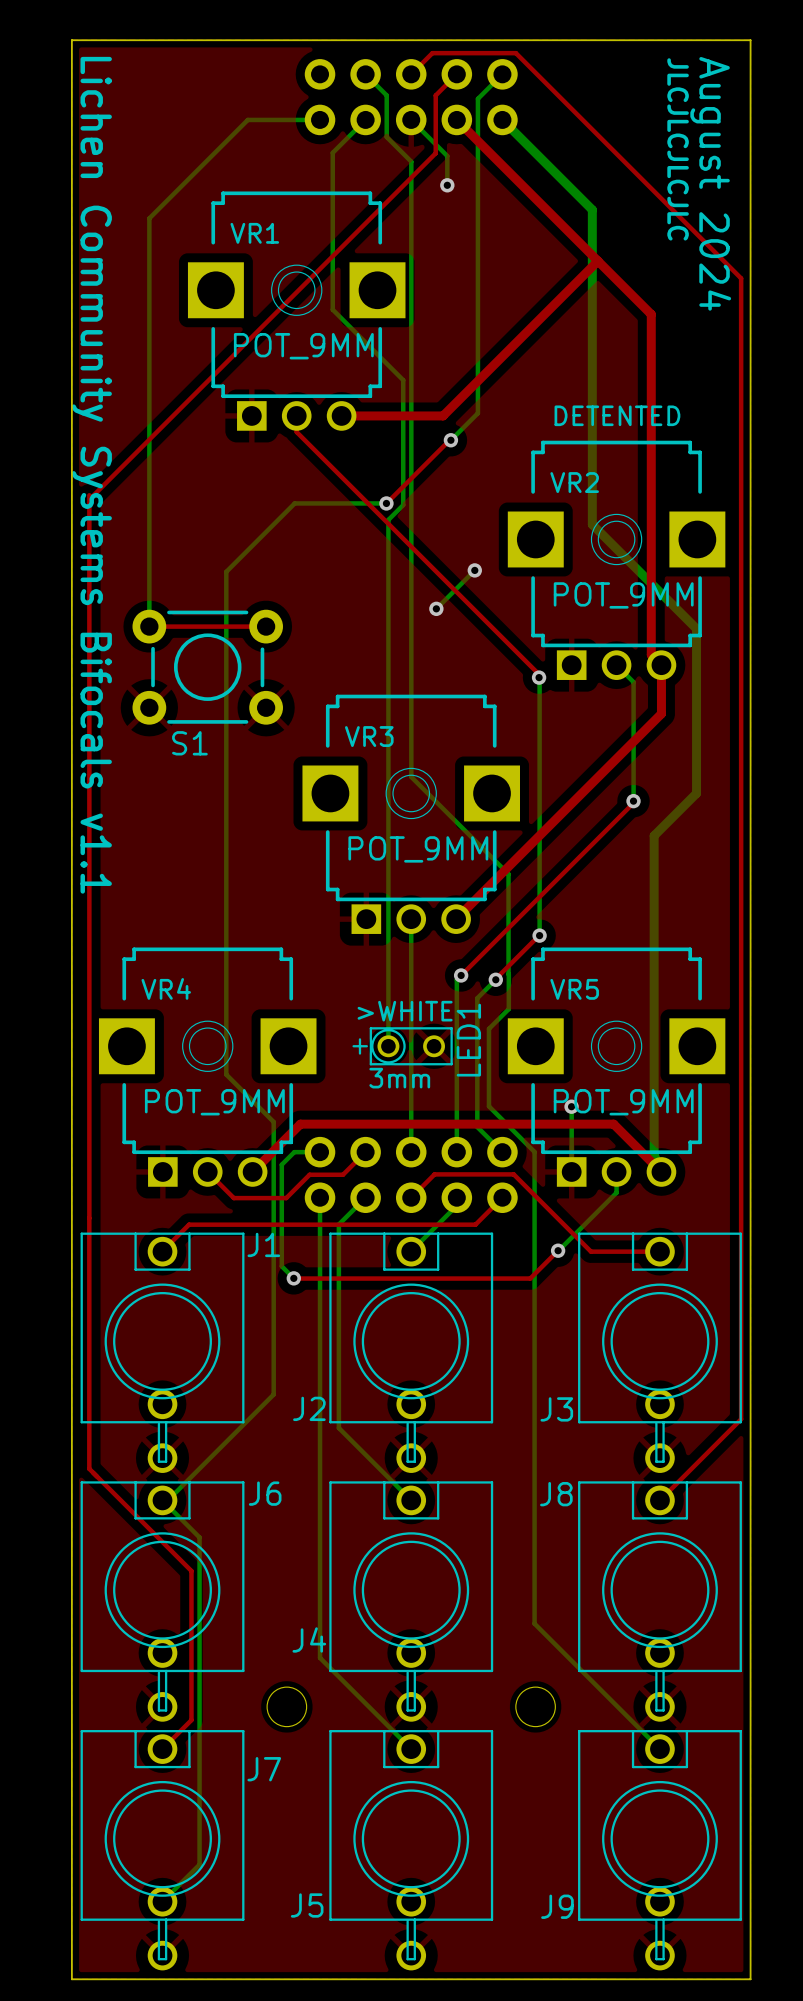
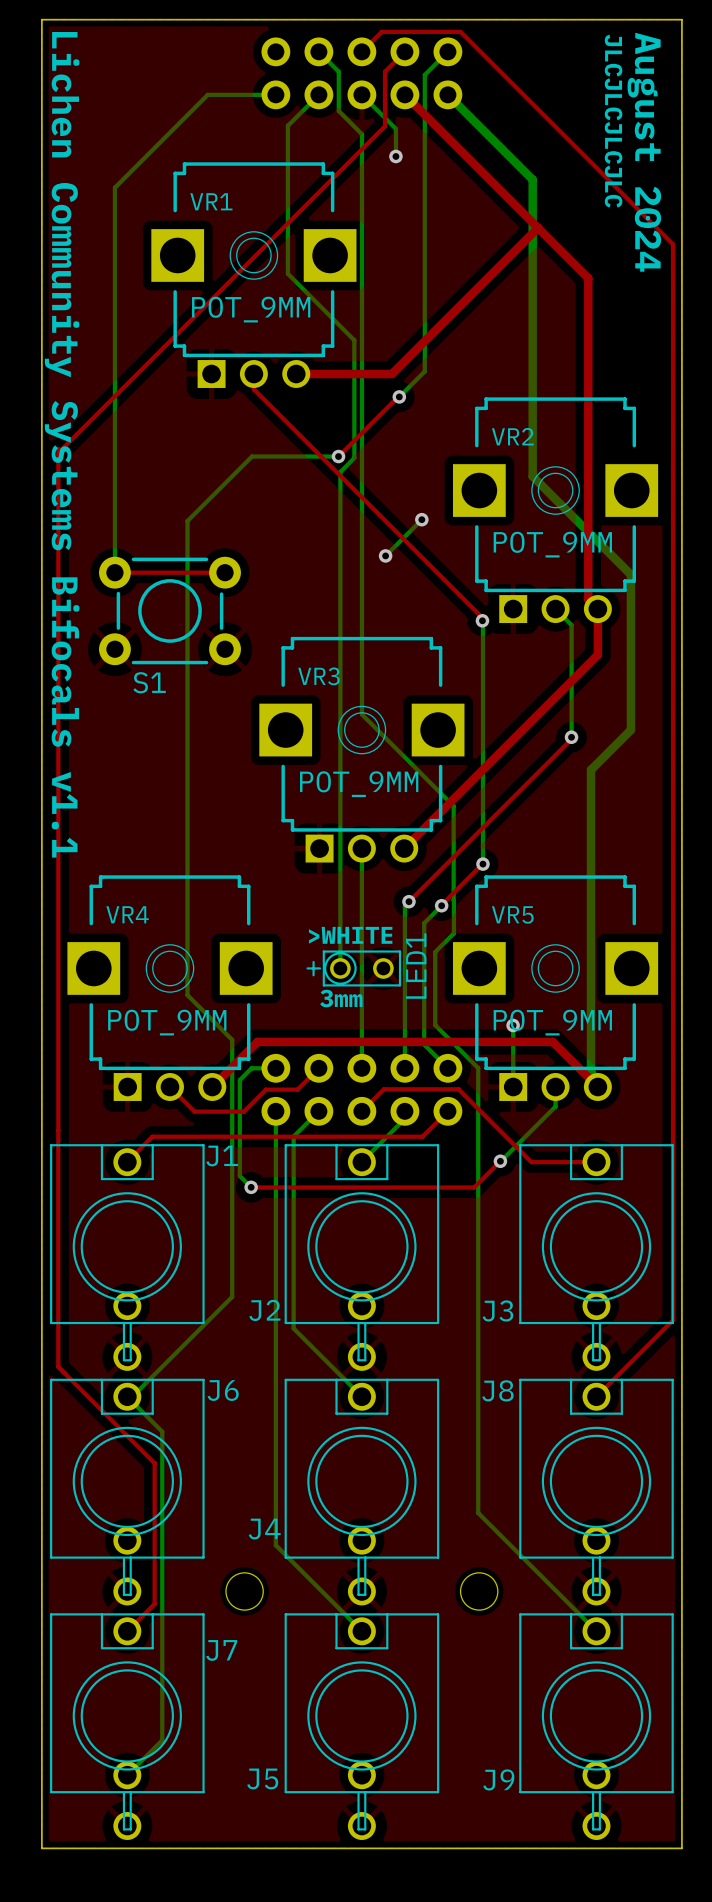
text: DETENTED (617, 415) -> none

